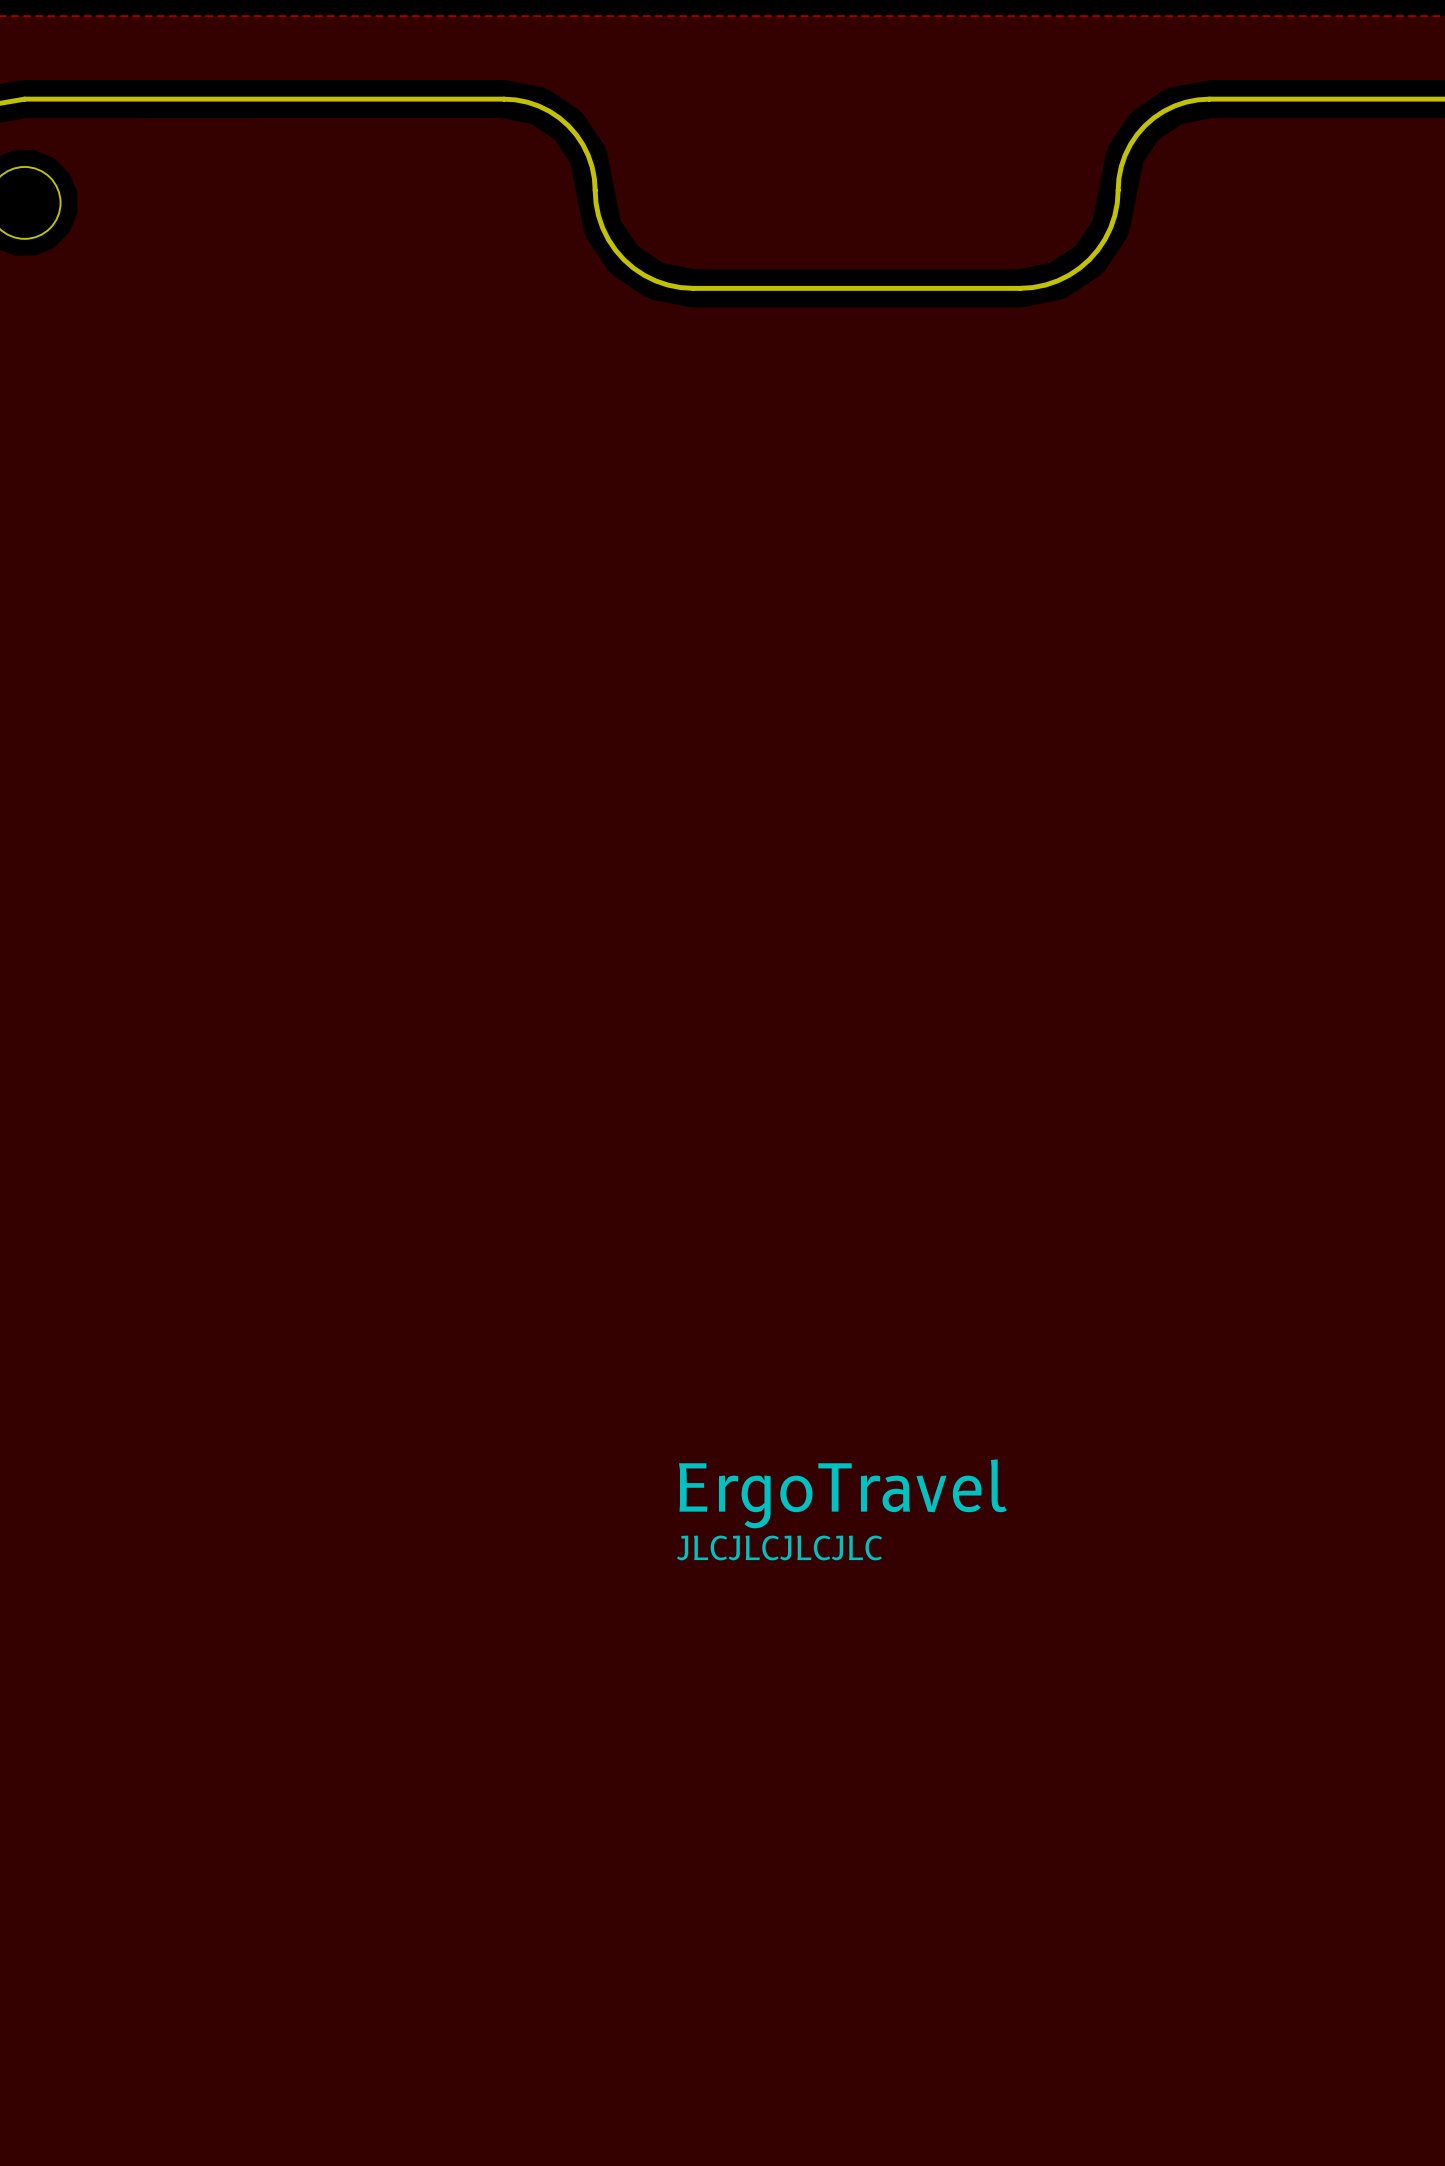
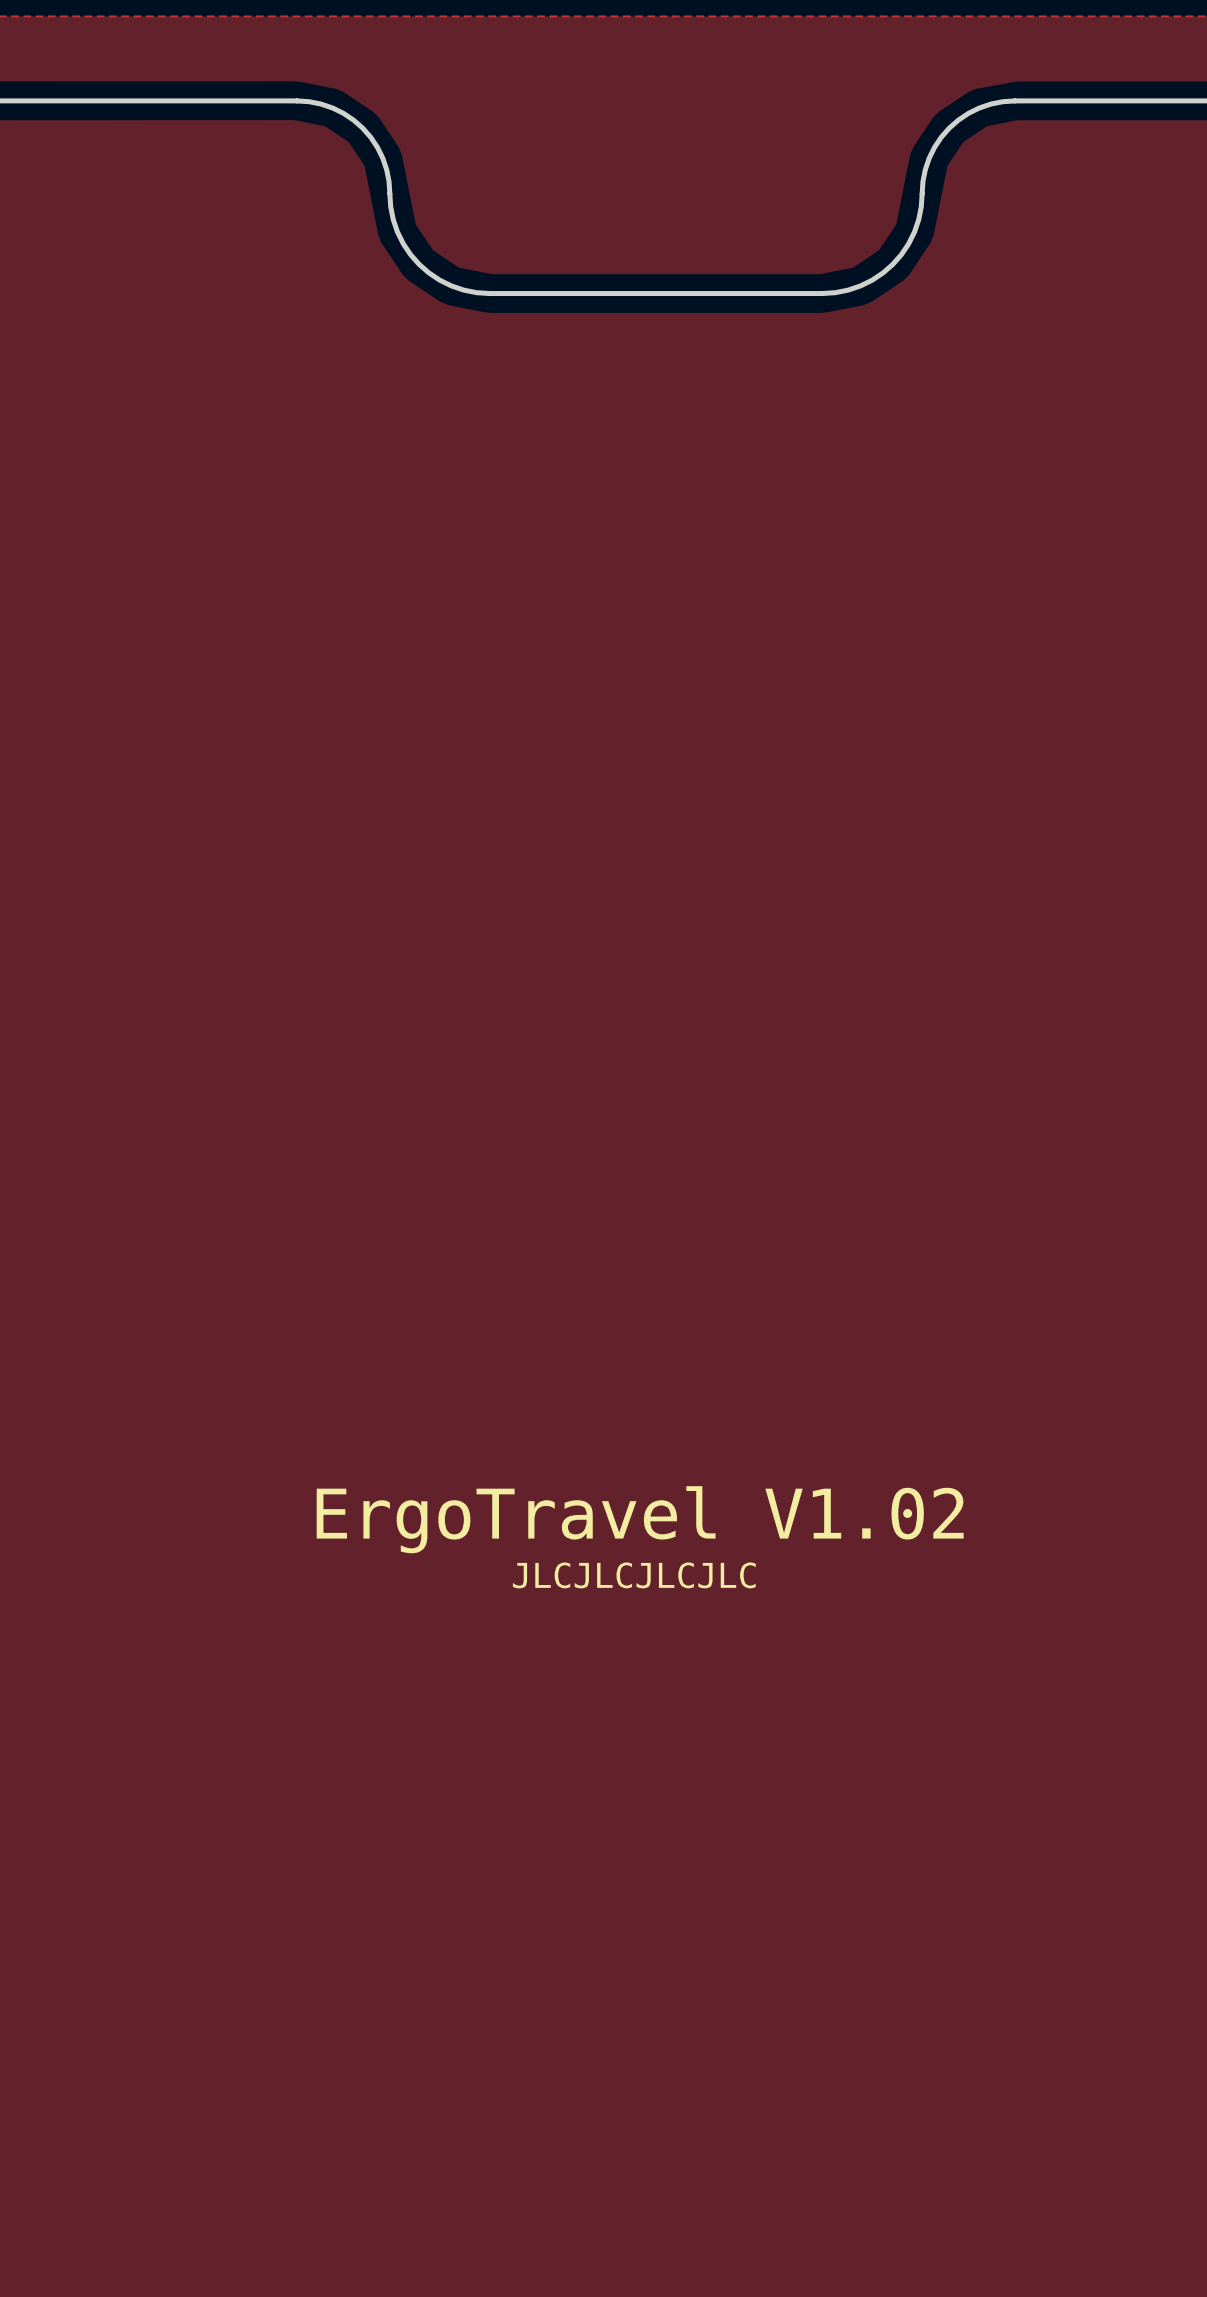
text: ErgoTravel (842, 1493) -> ErgoTravel V1.02 (640, 1519)
text position: JLCJLCJLCJLC (779, 1547) -> JLCJLCJLCJLC (634, 1575)

